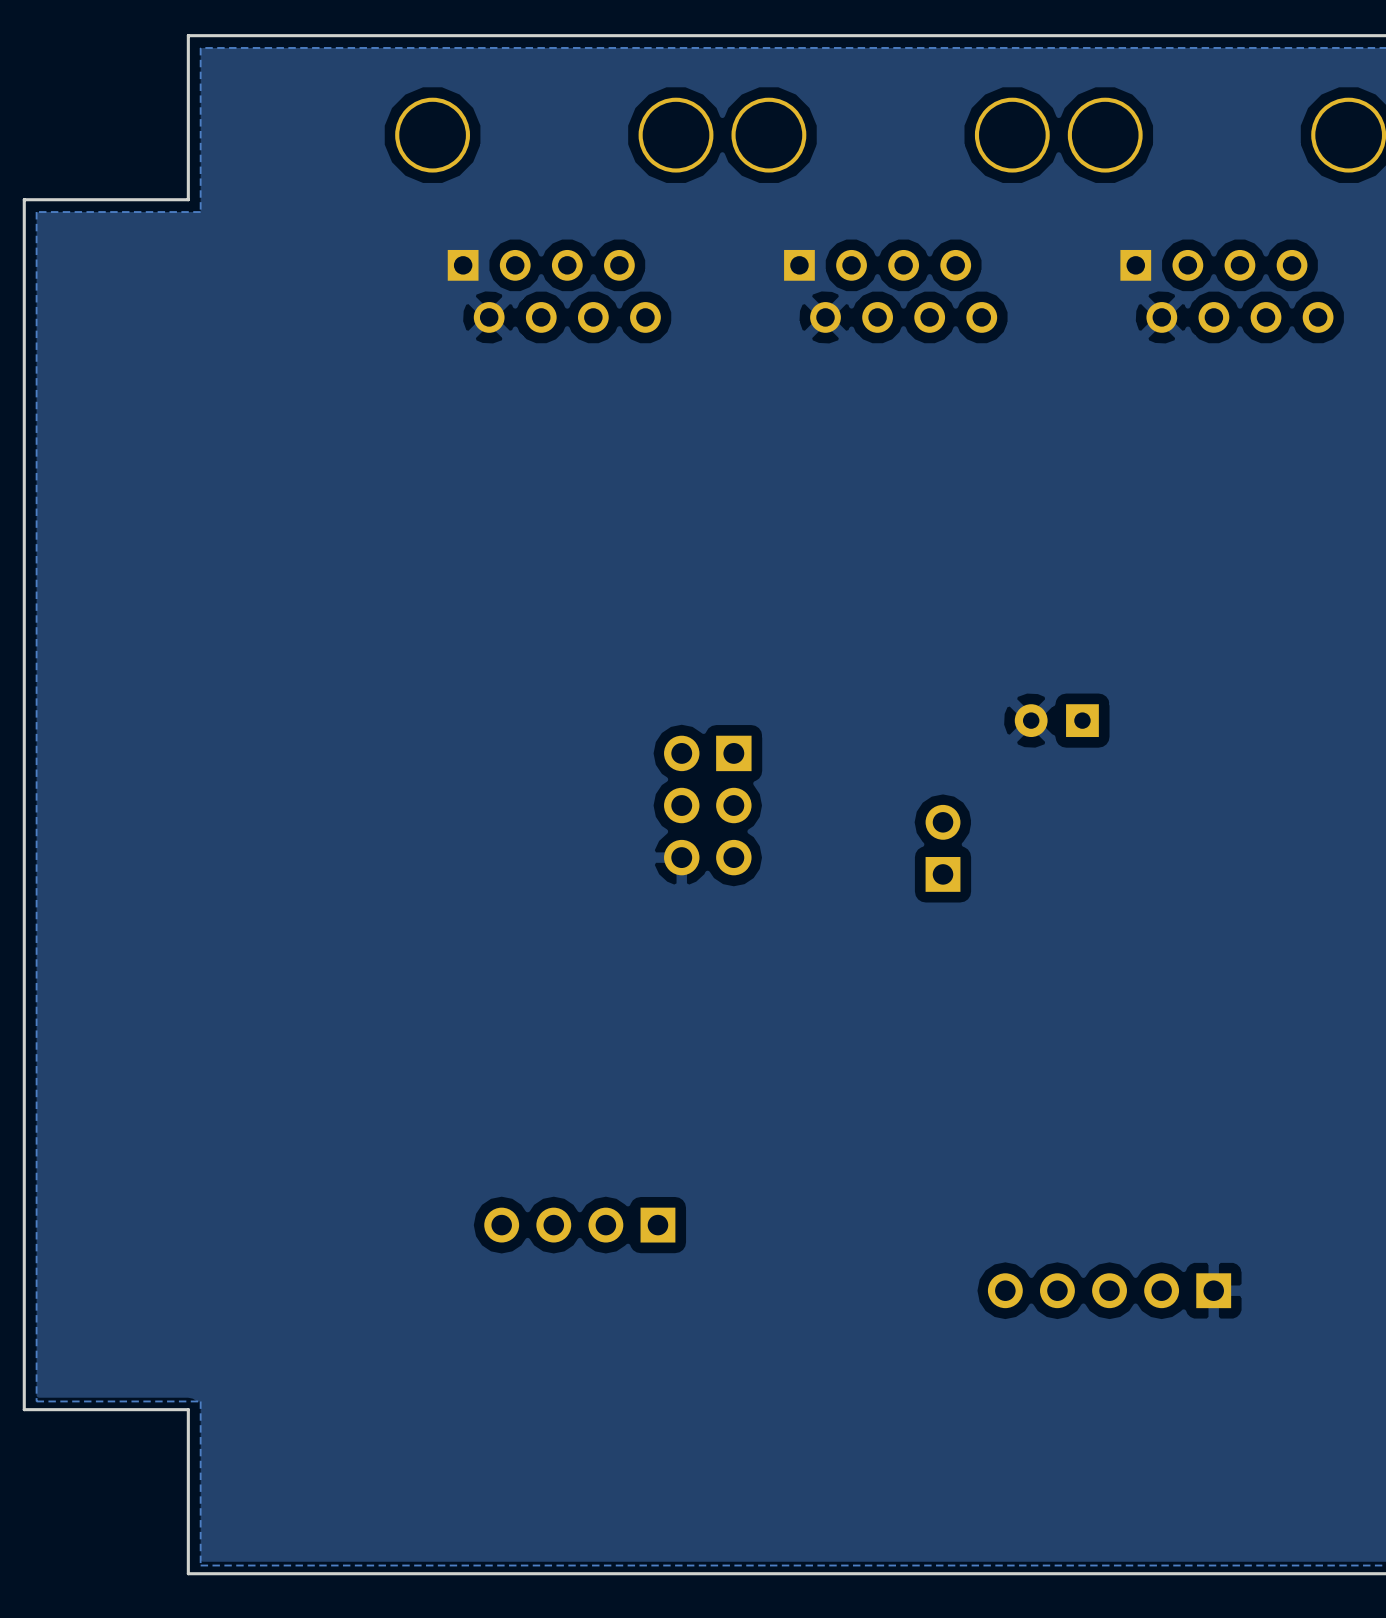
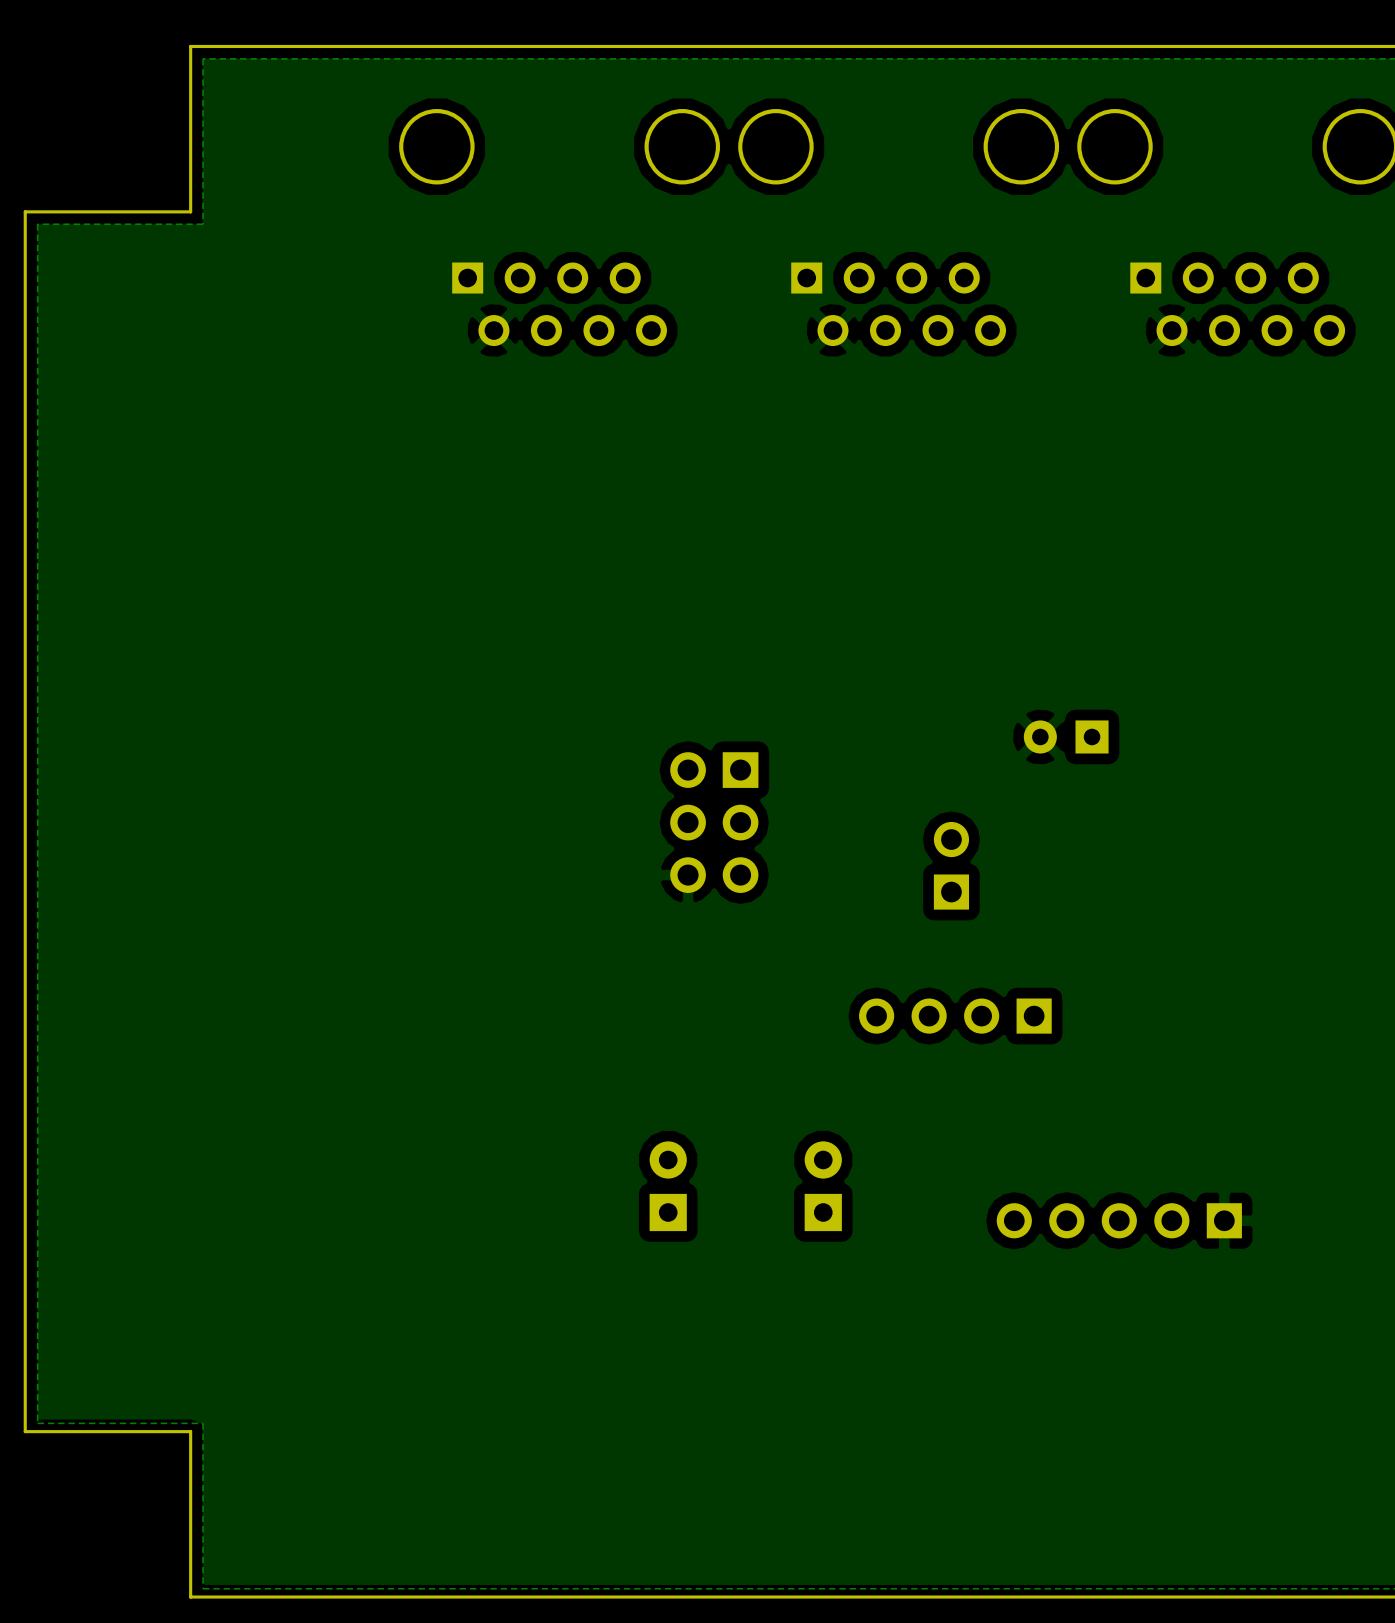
part: none -> (668, 1186)
part: none -> (823, 1186)
part position: (579, 1225) -> (955, 1016)
part position: (1109, 1290) -> (1119, 1220)

